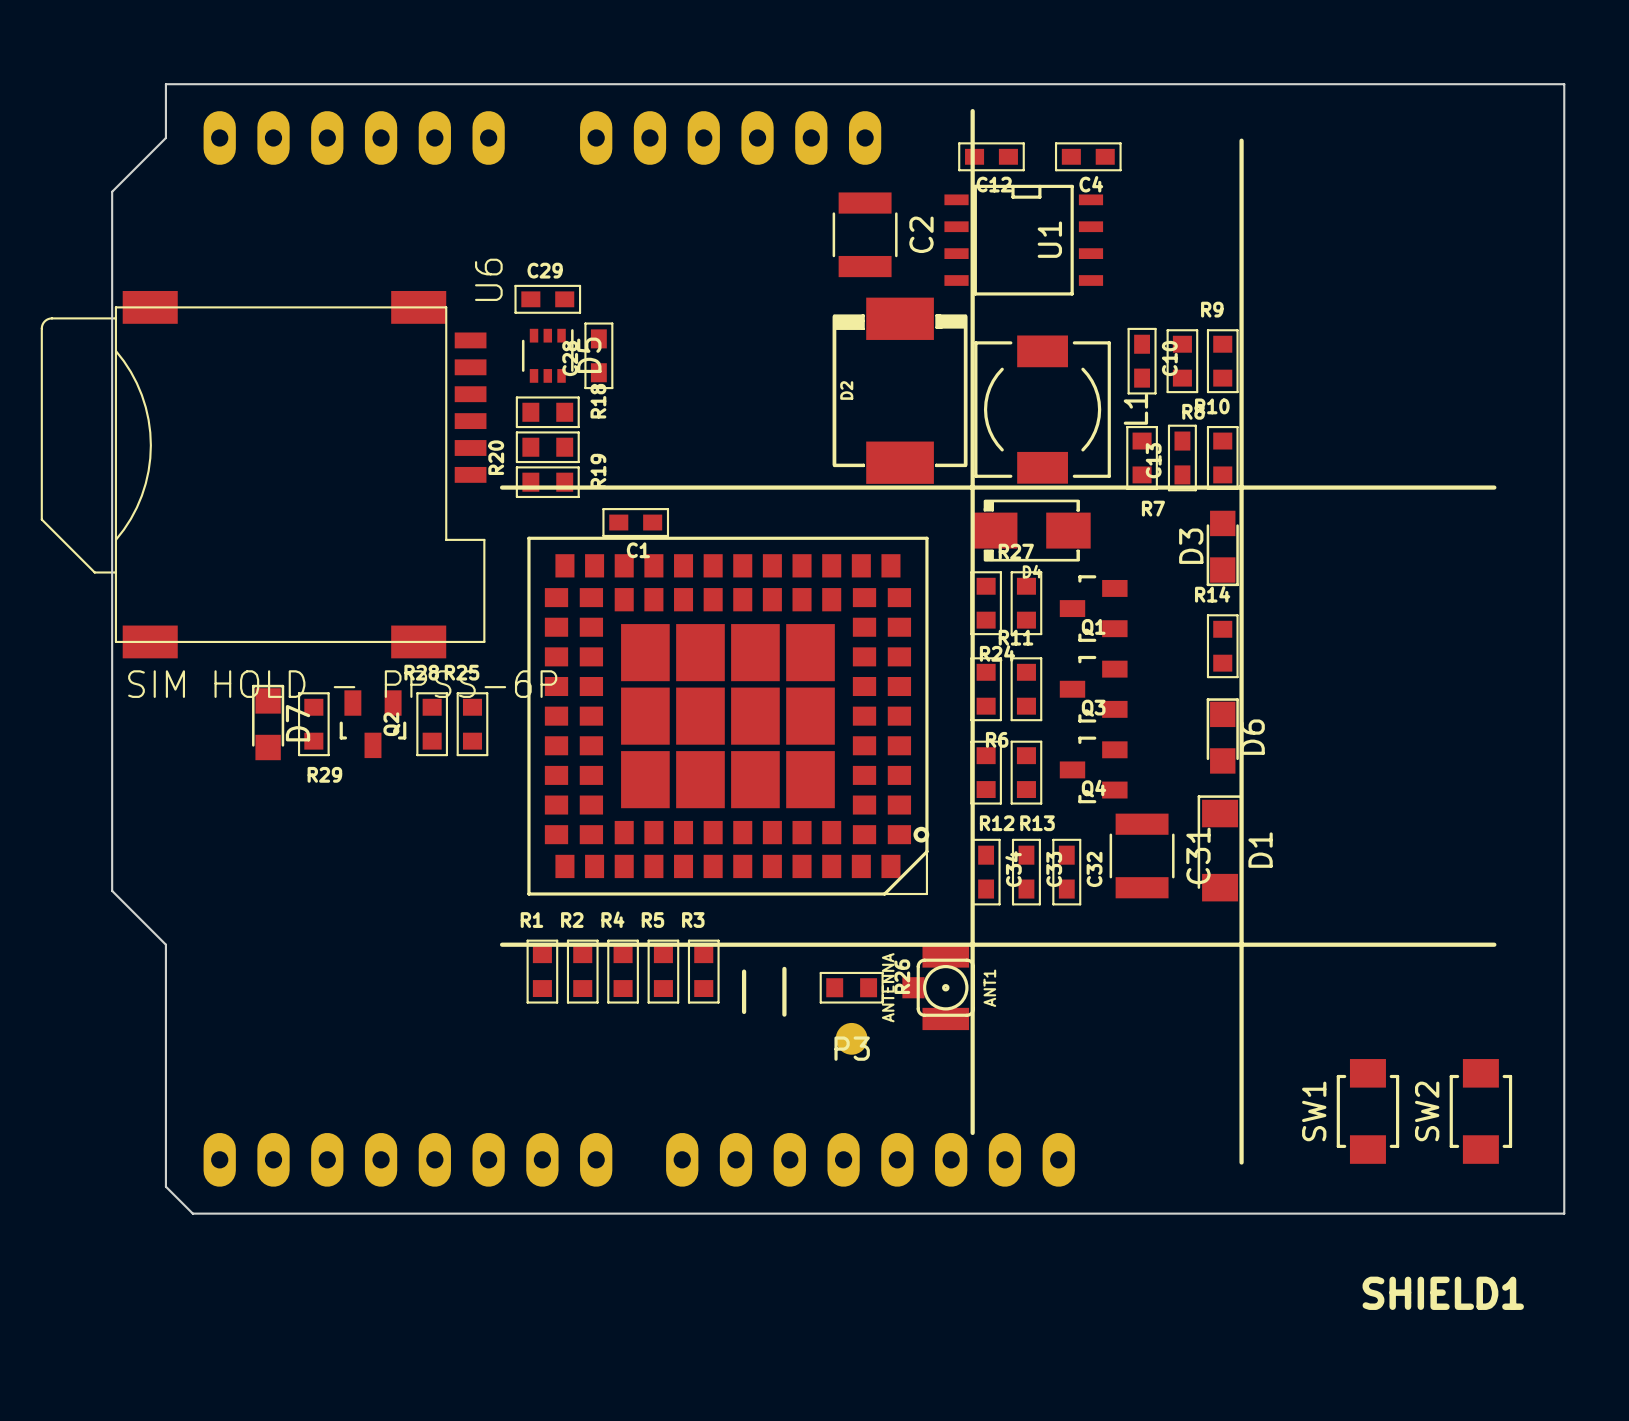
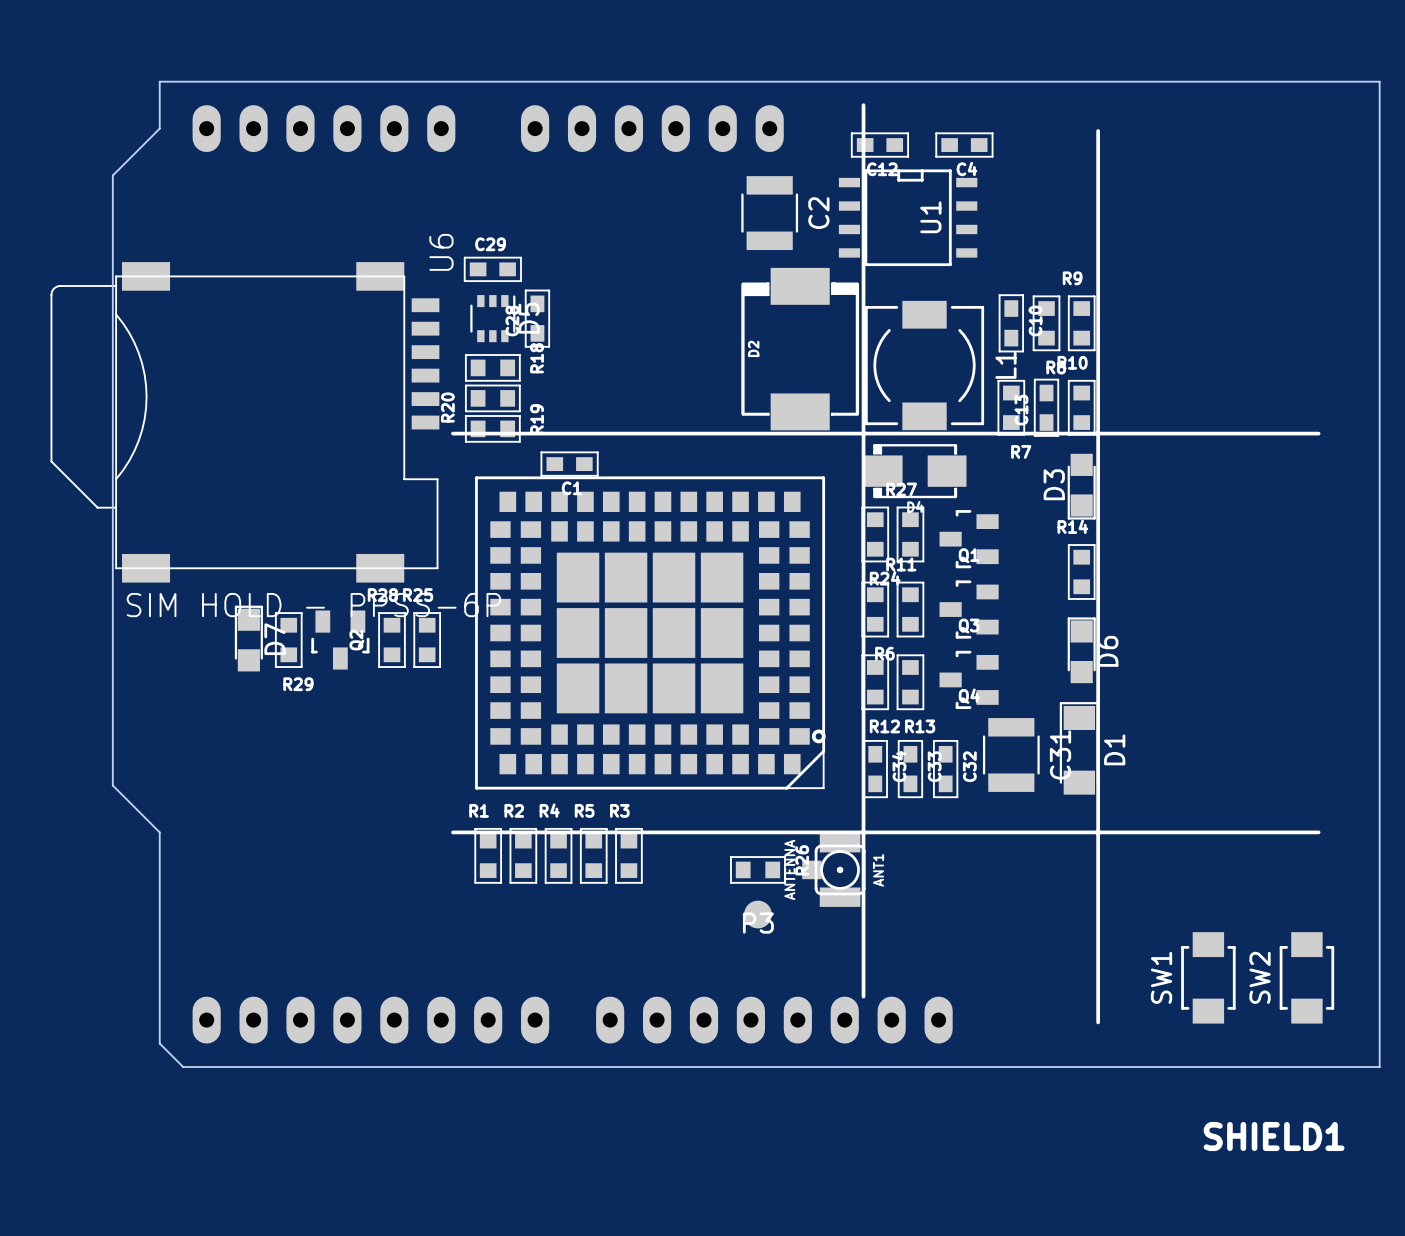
line: (784, 968) (784, 1014) -> none
line: (744, 971) (744, 1011) -> none

